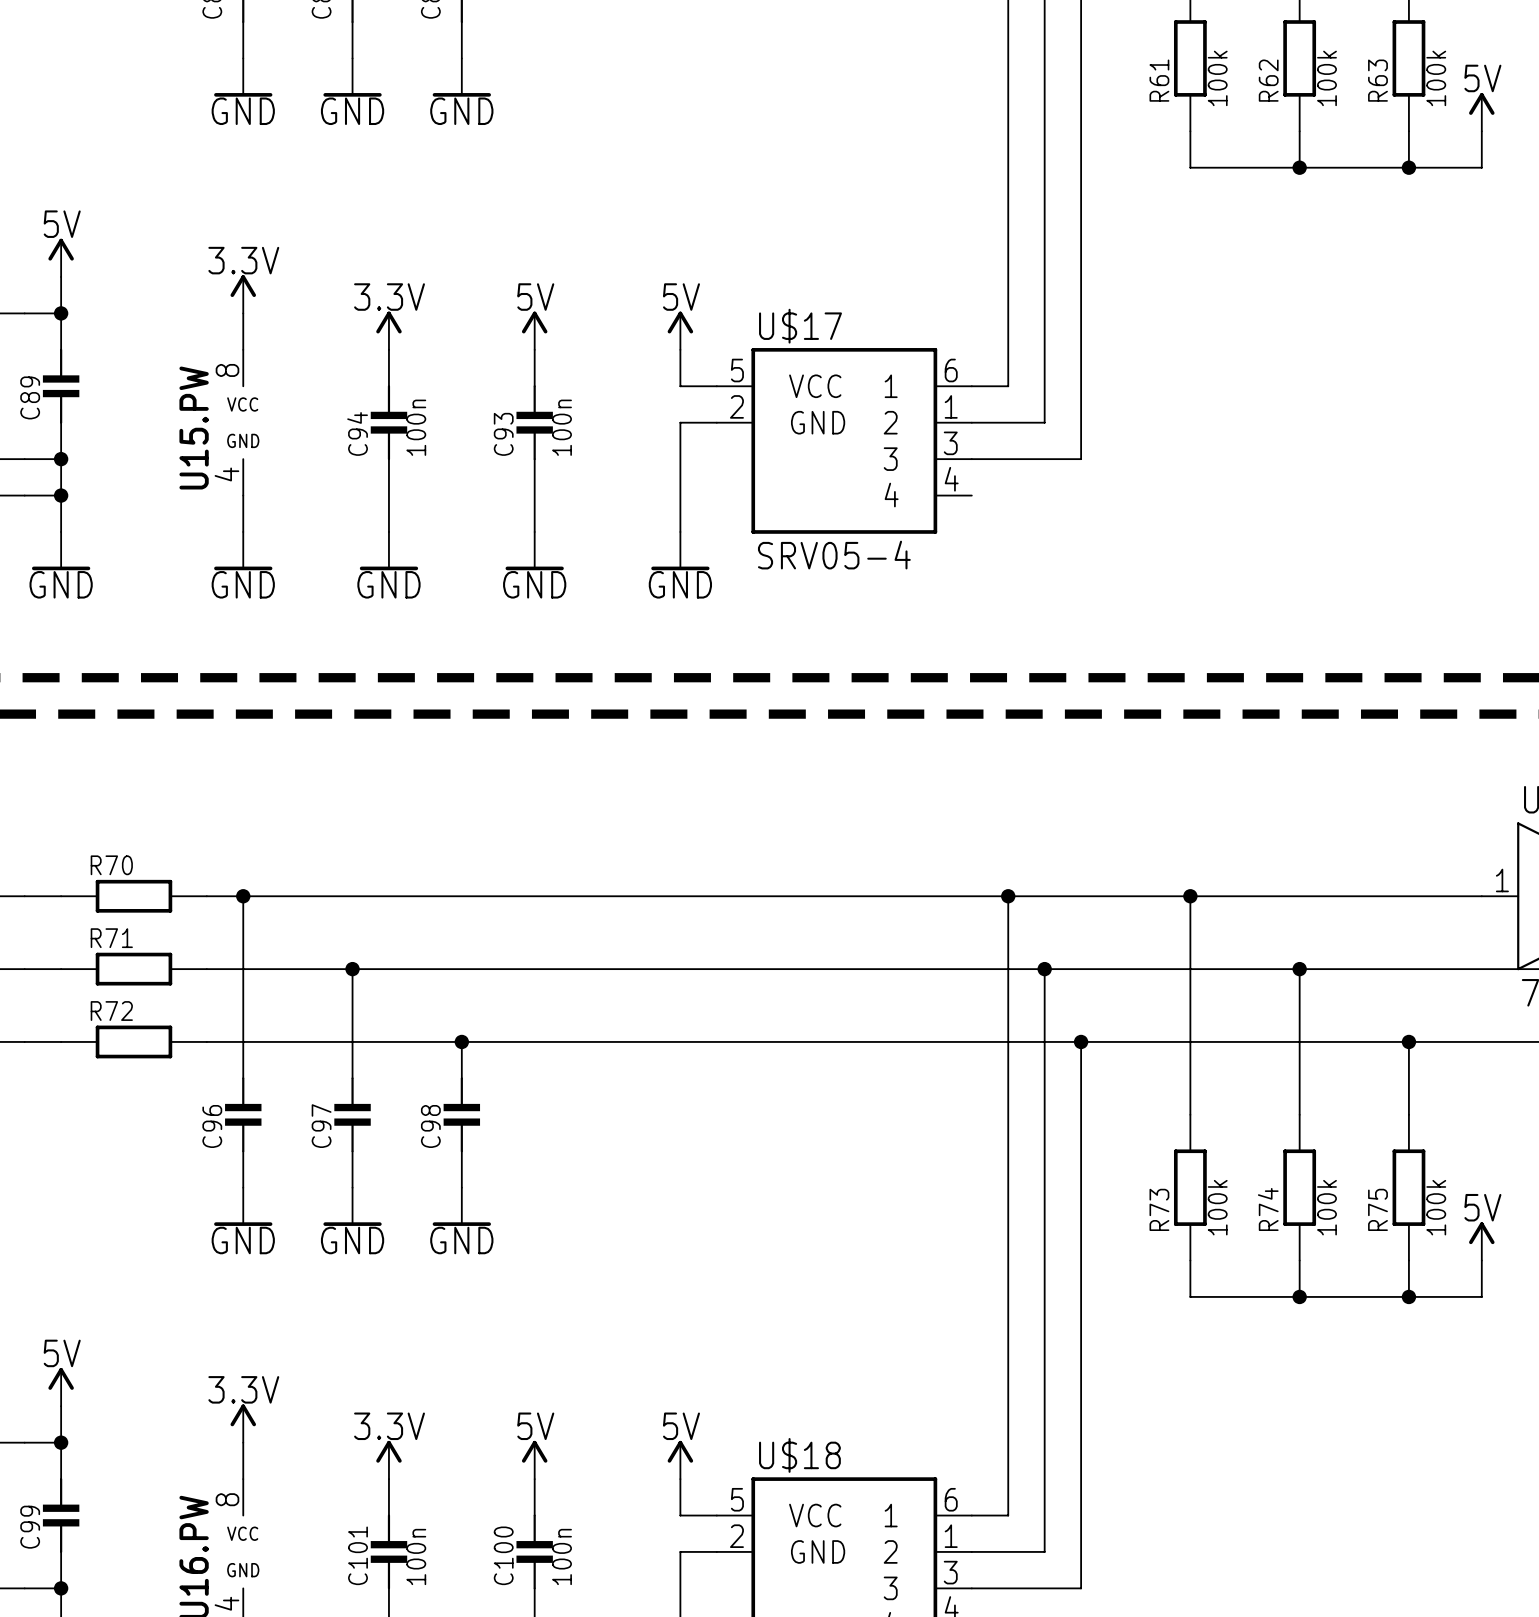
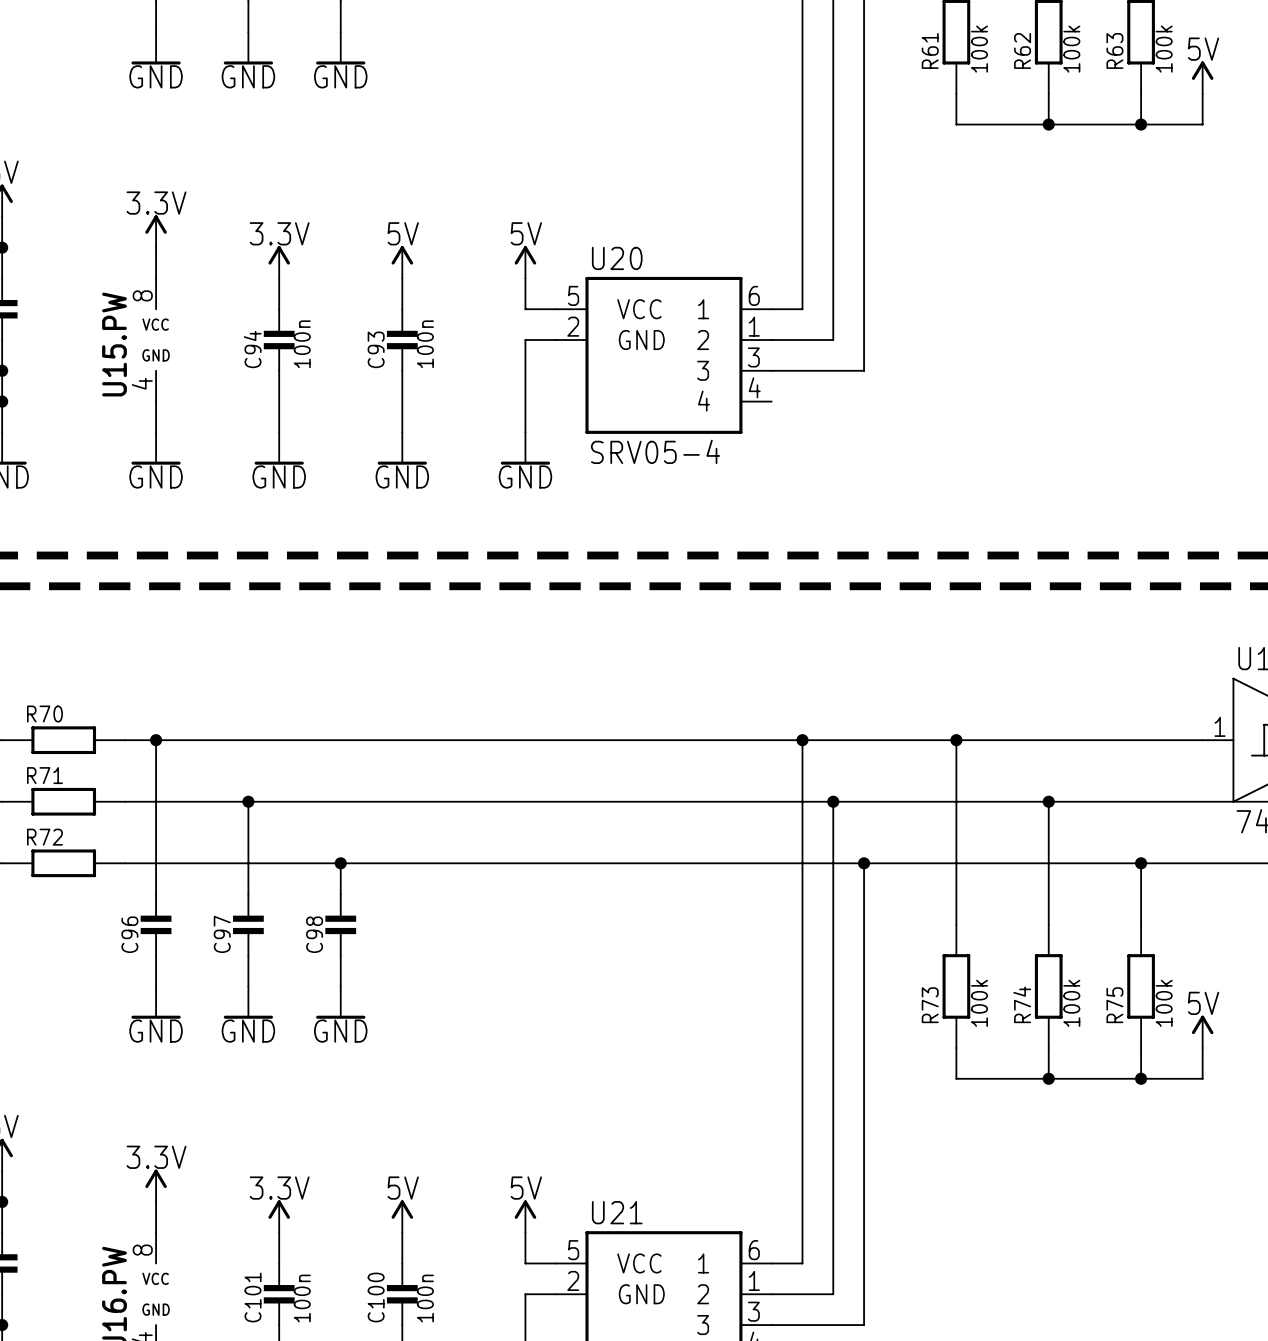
U$17 name: U$17 (800, 326) -> U20 (617, 258)
U$18 name: U$18 (799, 1455) -> U21 (617, 1212)

